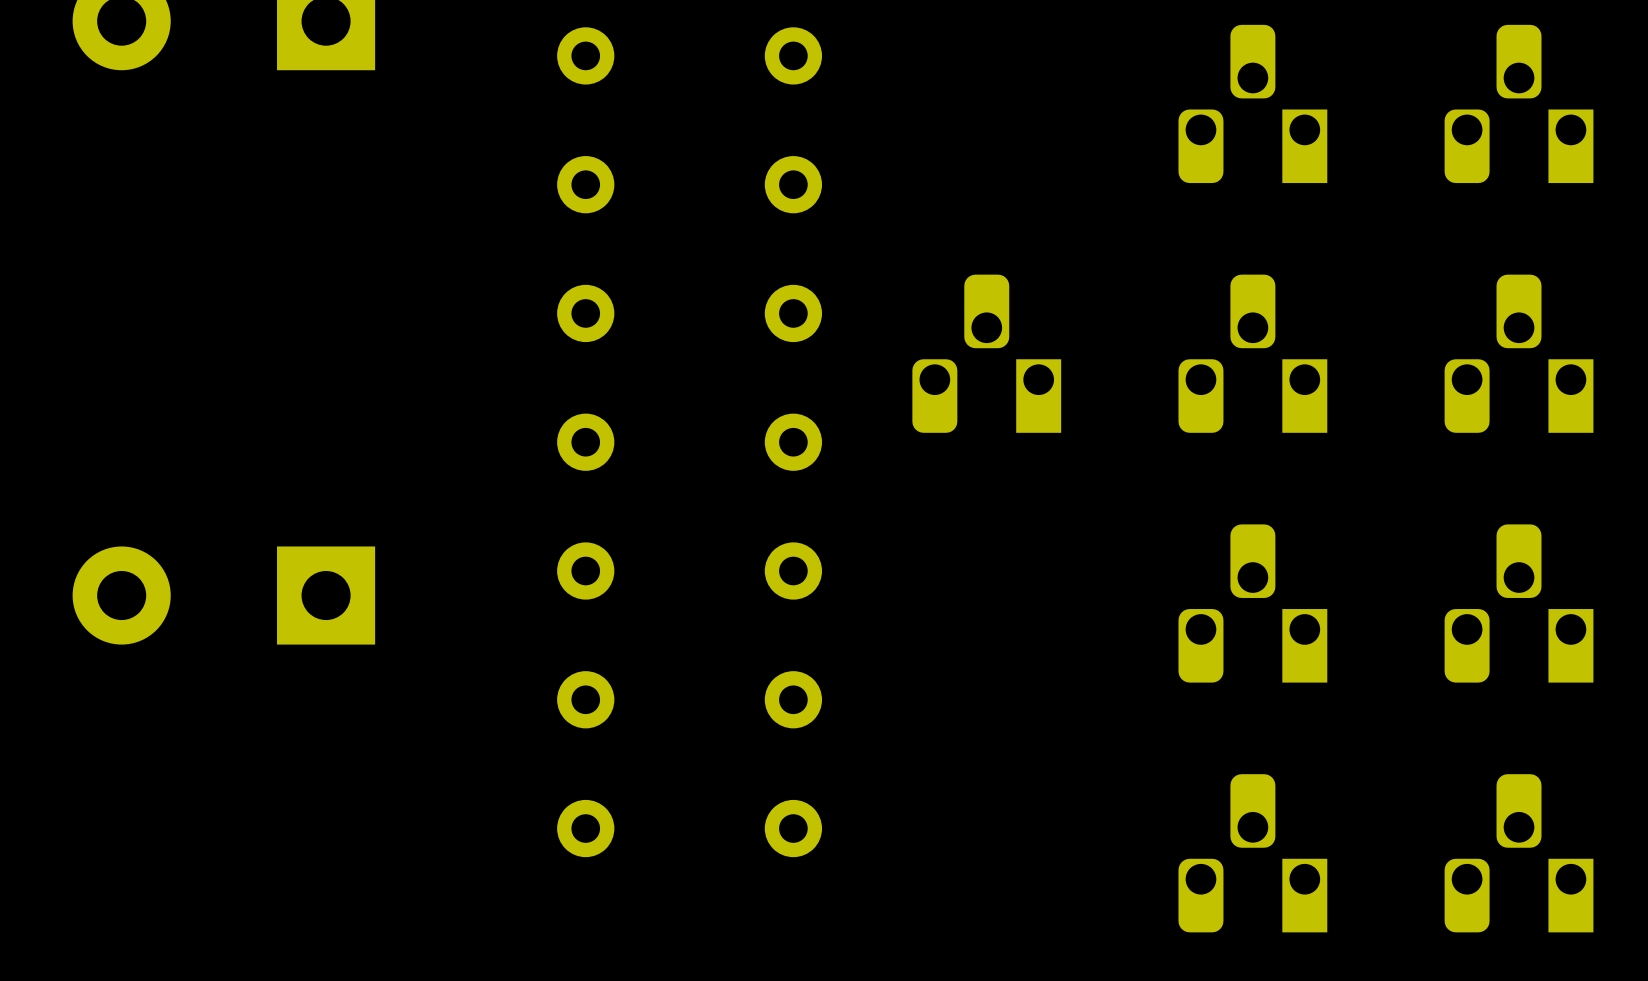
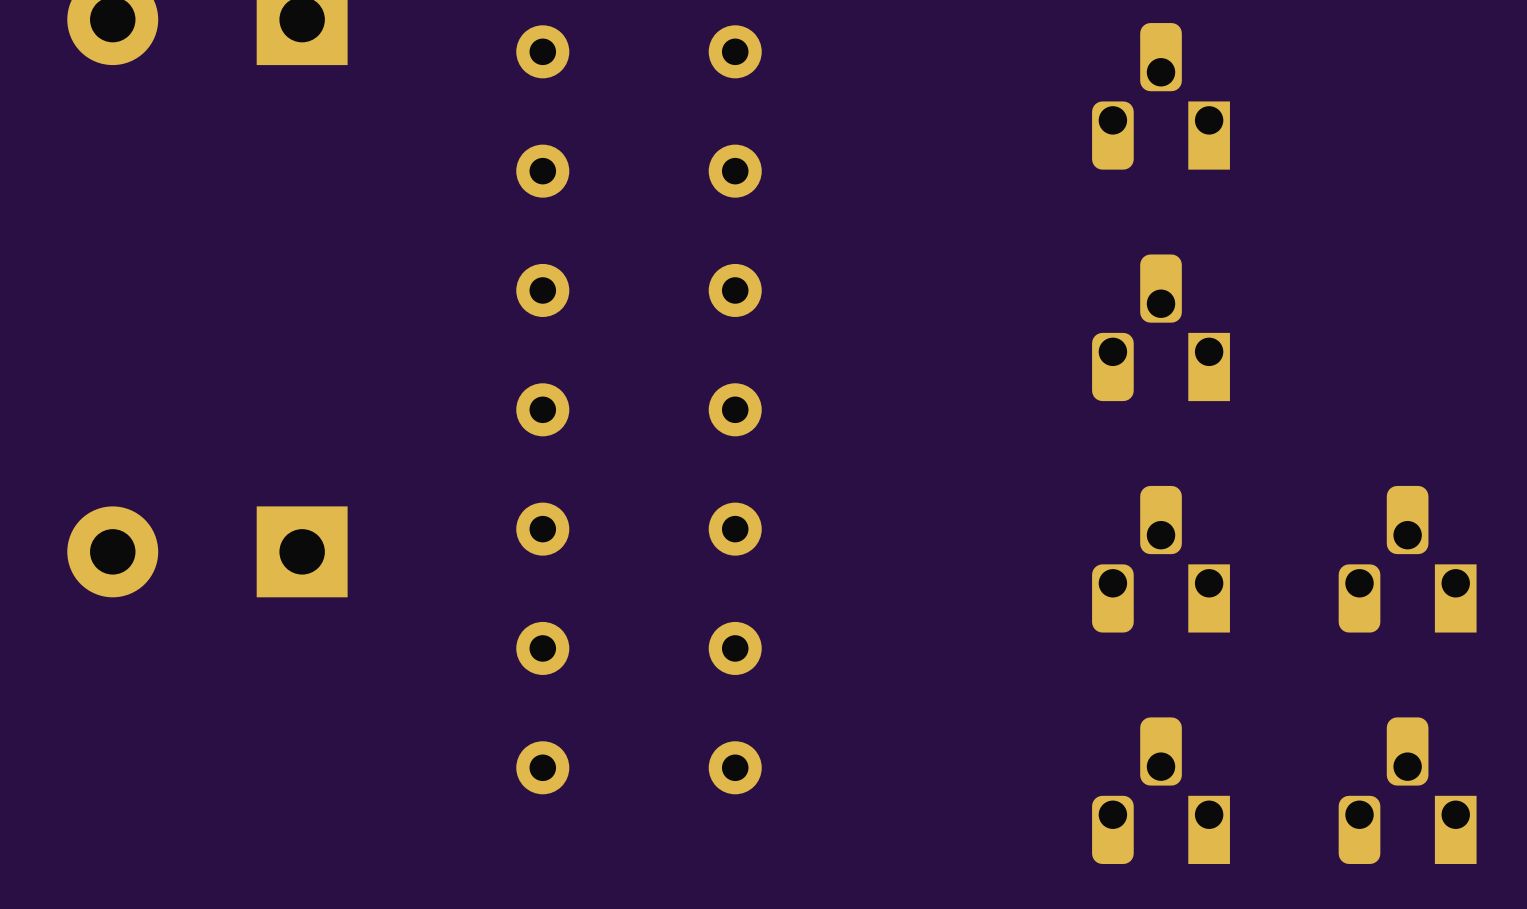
part: (1519, 103) -> none
part: (986, 353) -> none
part: (1519, 353) -> none

